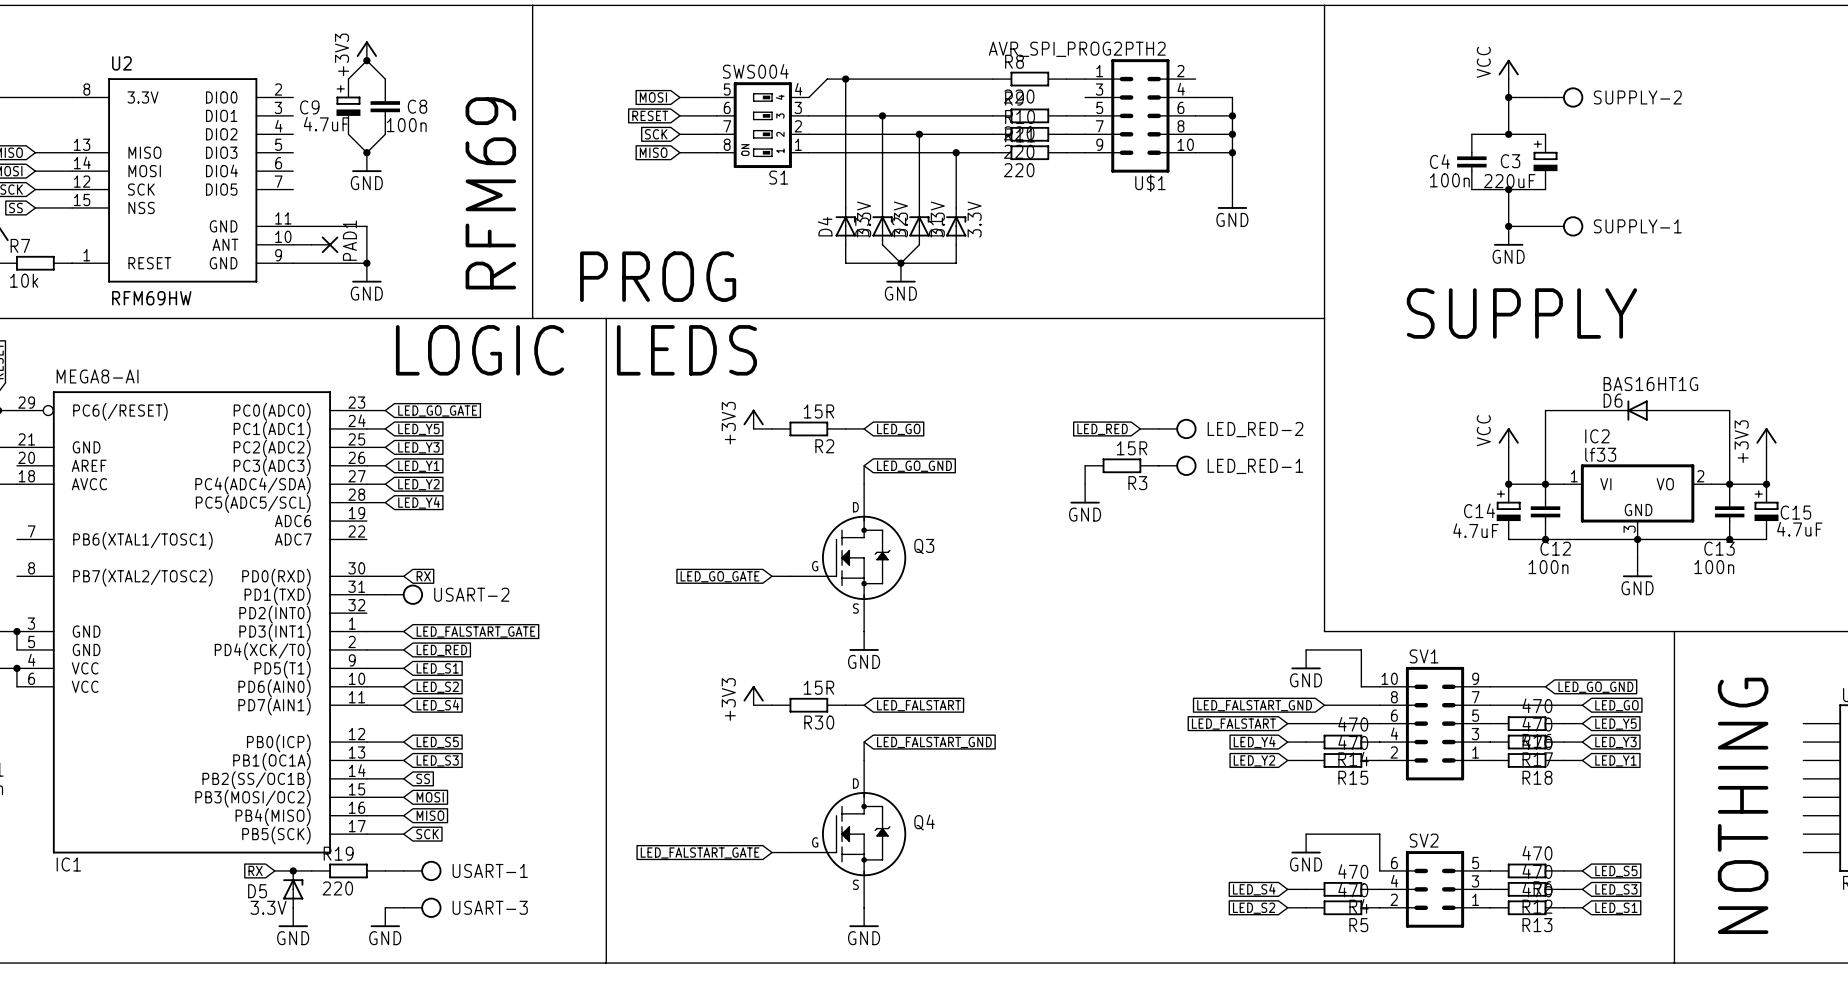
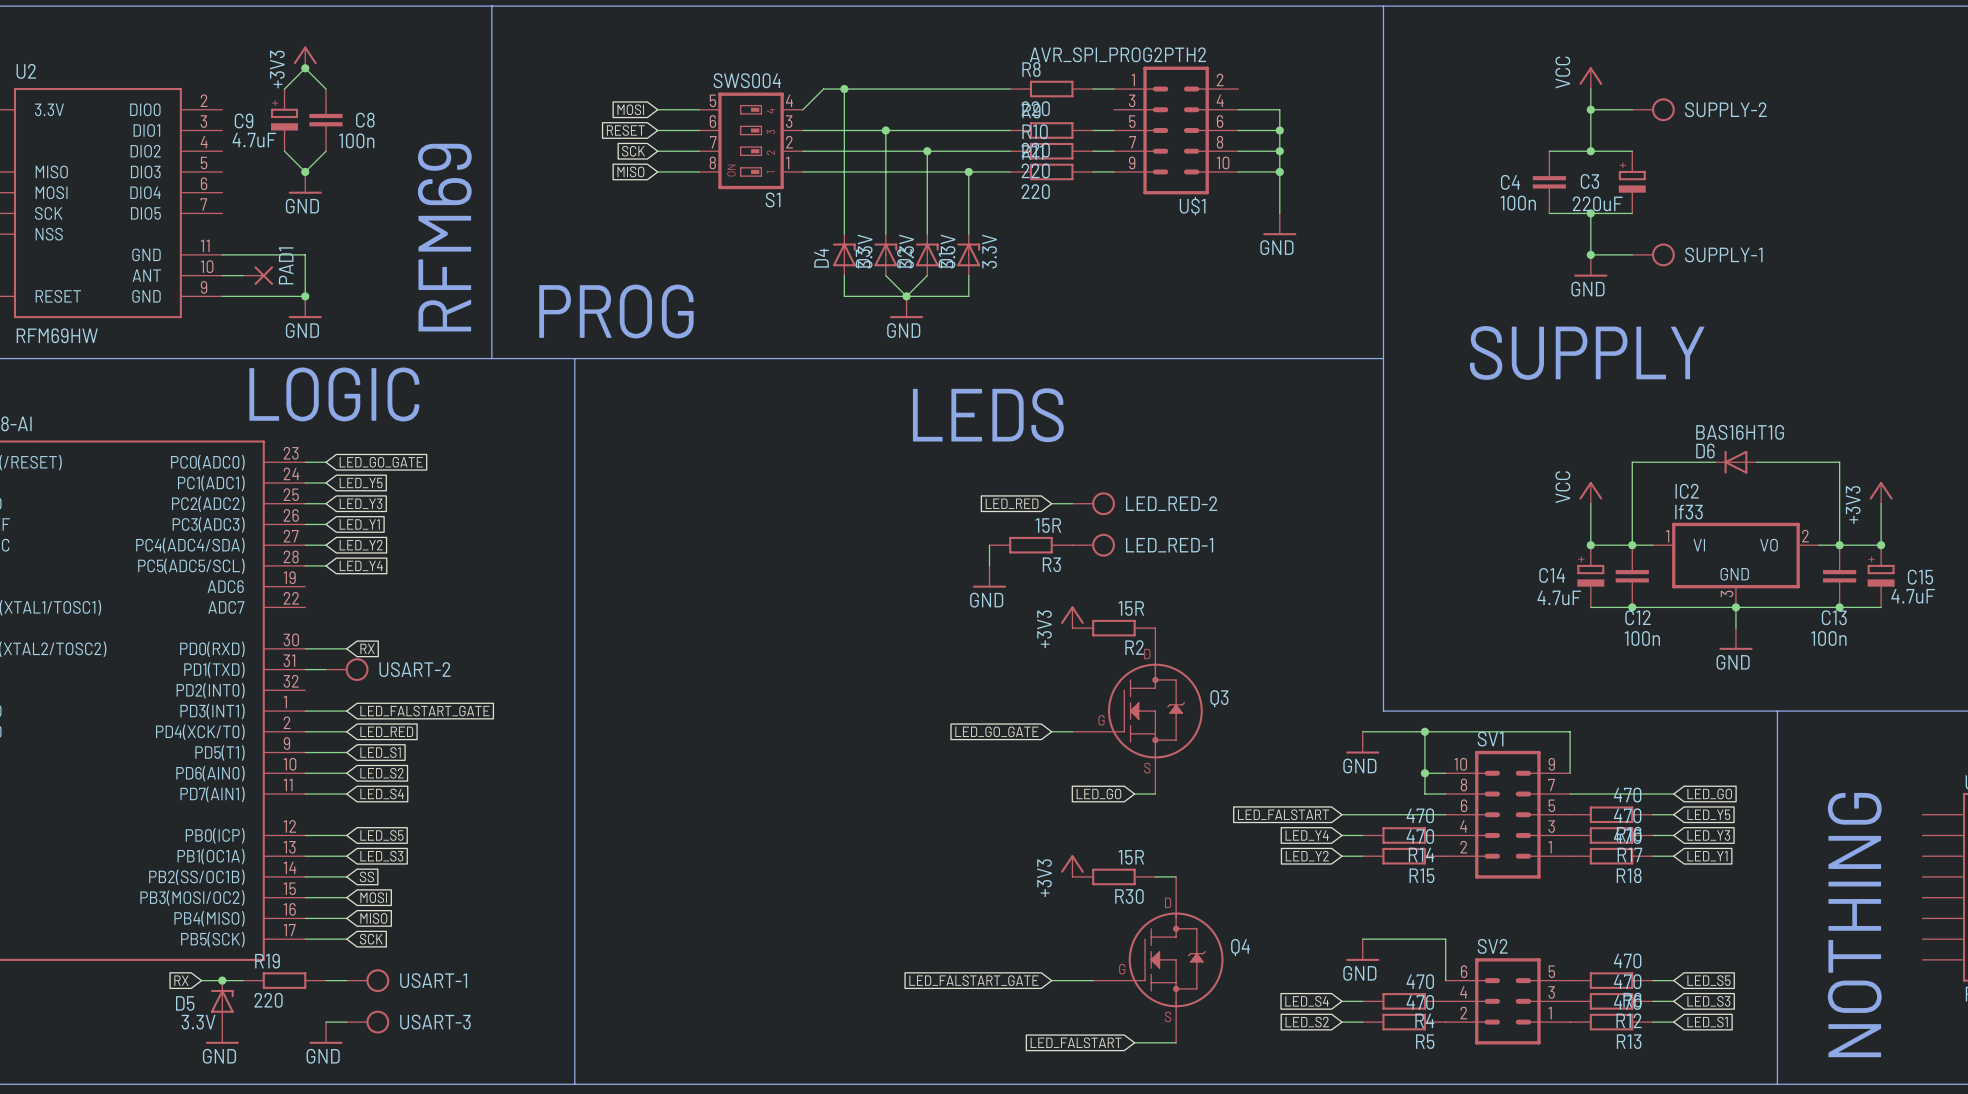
text position: LOGIC (479, 350) -> LOGIC (334, 394)
text: LEDS (686, 350) -> none
text: none -> LEDS (988, 415)
power symbol: +3V3 (753, 419) -> none
wire: (753, 428) (772, 428) -> none
R2 position: (808, 428) -> (1113, 628)
wire: (845, 428) (864, 428) -> none
wire: (1140, 428) (1158, 428) -> (1051, 503) (1072, 503)
LED_RED-2 position: (1177, 428) -> (1093, 503)
global label: LED_GO (898, 429) -> none
global label position: LED_RED (1102, 429) -> LED_RED (1012, 503)
wire: (864, 465) (864, 484) -> none
wire: (1085, 465) (1085, 484) -> (989, 545) (989, 565)
R3 position: (1121, 465) -> (1030, 545)
LED_RED-1 position: (1177, 465) -> (1093, 545)
global label: LED_GO_GND (914, 466) -> none
power symbol: GND (1085, 493) -> none
power symbol: none -> GND (989, 576)
power symbol: none -> +3V3 (1072, 617)
Q3 position: (848, 557) -> (1137, 711)
global label: LED_GO_GATE (720, 576) -> none
wire: (772, 576) (790, 576) -> none
power symbol: GND (864, 641) -> none
wire: none -> (1051, 731) (1072, 731)
junction: none -> (1424, 731)
global label: none -> LED_GO_GATE (996, 731)
junction: none -> (1424, 773)
wire: (1490, 686) (1545, 686) -> (1570, 773) (1570, 731) (1424, 731)
global label: LED_GO_GND (1595, 687) -> none
power symbol: +3V3 (753, 695) -> none
wire: (753, 705) (772, 705) -> none
R30 position: (808, 705) -> (1113, 876)
wire: (845, 705) (864, 705) -> none
global label: LED_FALSTART (919, 705) -> none
global label: none -> LED_GO (1098, 794)
wire: none -> (1134, 794) (1155, 794)
global label: LED_FALSTART_GND (1254, 705) -> none
wire: (1324, 705) (1361, 705) -> (1424, 773) (1424, 794)
wire: (864, 742) (864, 760) -> none
global label: LED_FALSTART_GND (934, 742) -> none
power symbol: none -> +3V3 (1072, 866)
wire: none -> (1155, 876) (1176, 876)
Q4 position: (848, 834) -> (1158, 959)
global label: LED_FALSTART_GATE (700, 852) -> none
wire: (772, 852) (790, 852) -> none
wire: none -> (1051, 980) (1093, 980)
global label: none -> LED_FALSTART_GATE (973, 980)
power symbol: GND (864, 917) -> none
global label: none -> LED_FALSTART (1076, 1042)
wire: none -> (1134, 1042) (1176, 1042)

